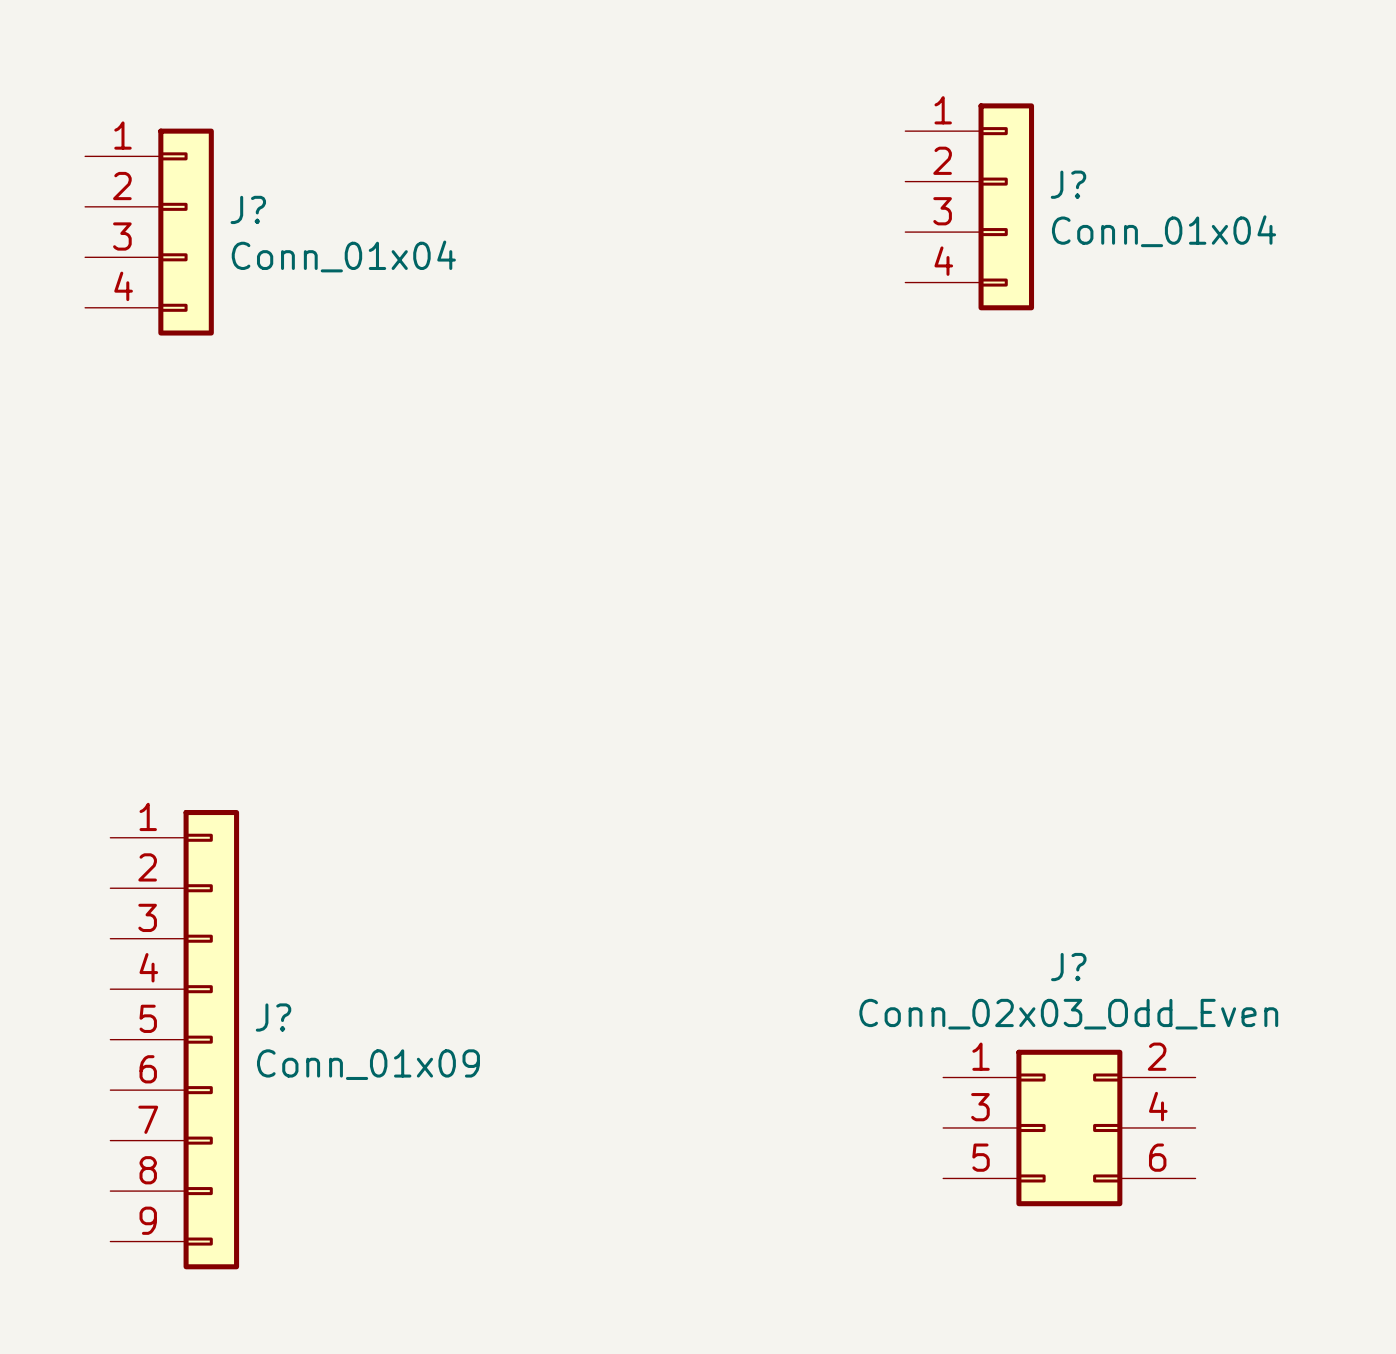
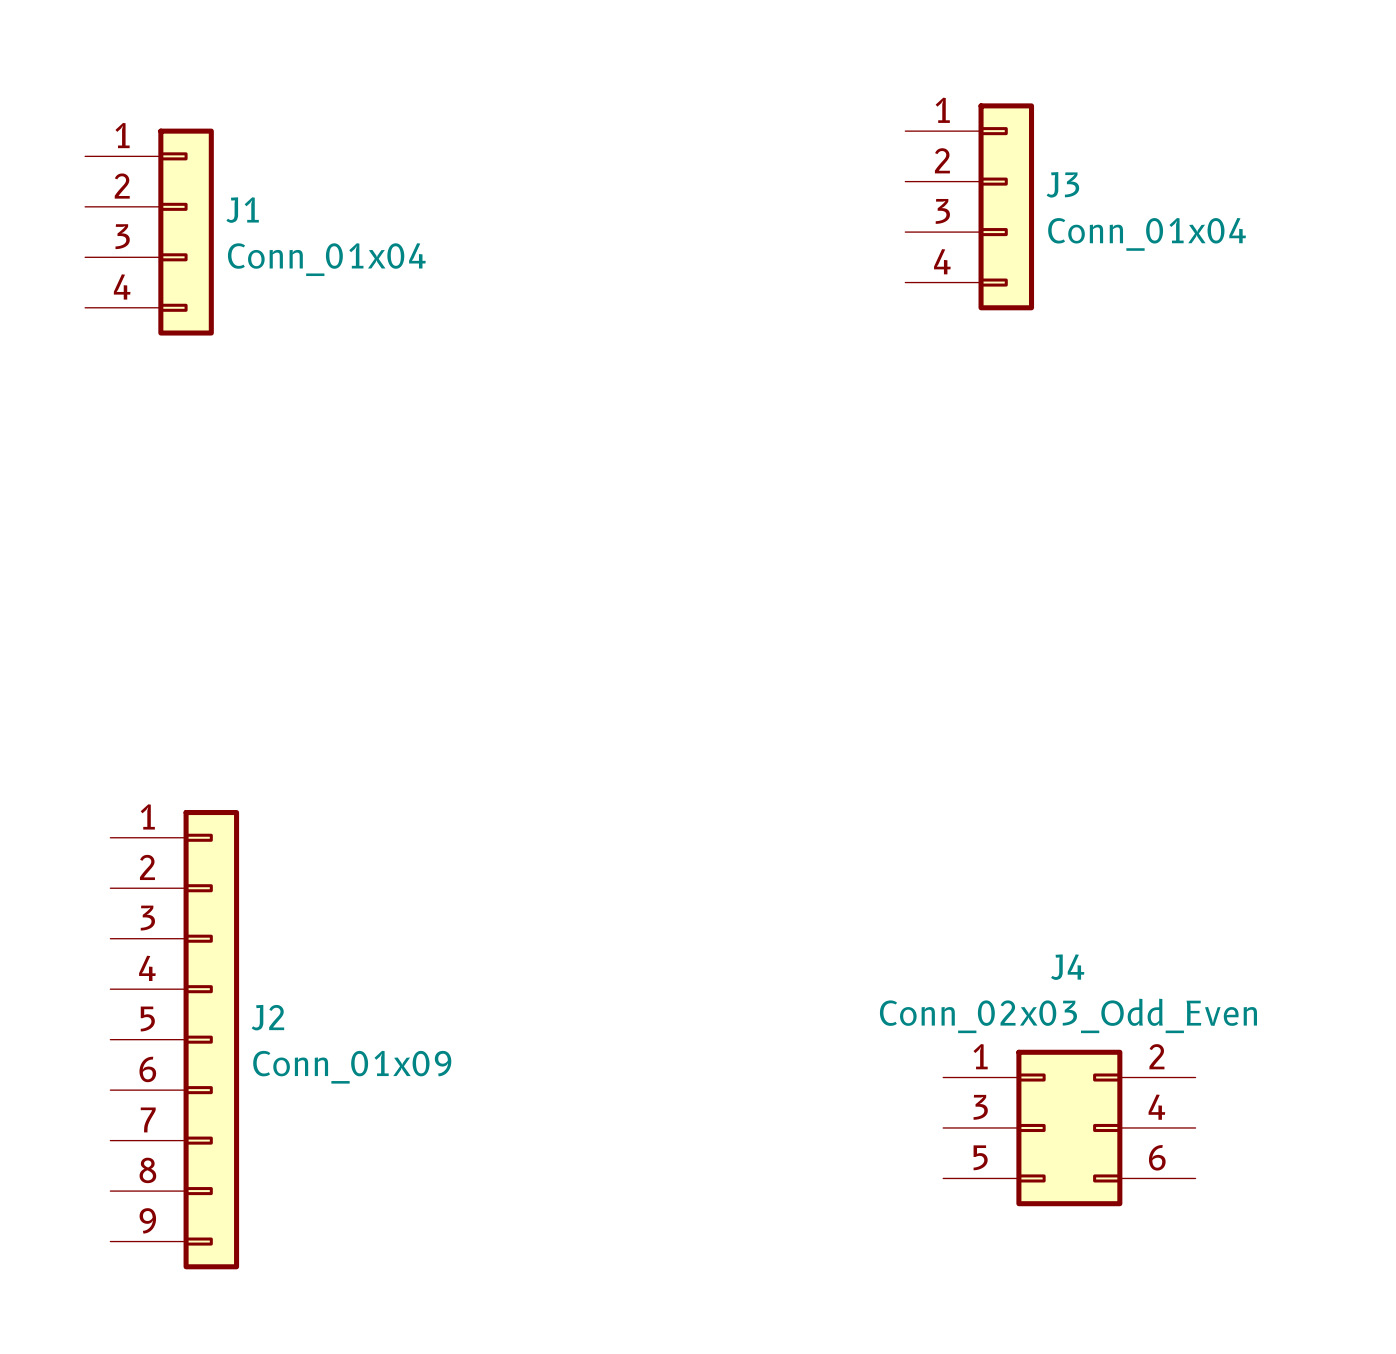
J? name: J? (1068, 184) -> J3 (1062, 184)
J? name: J? (248, 209) -> J1 (242, 210)
J? name: J? (1068, 967) -> J4 (1067, 967)
J? name: J? (273, 1017) -> J2 (267, 1017)

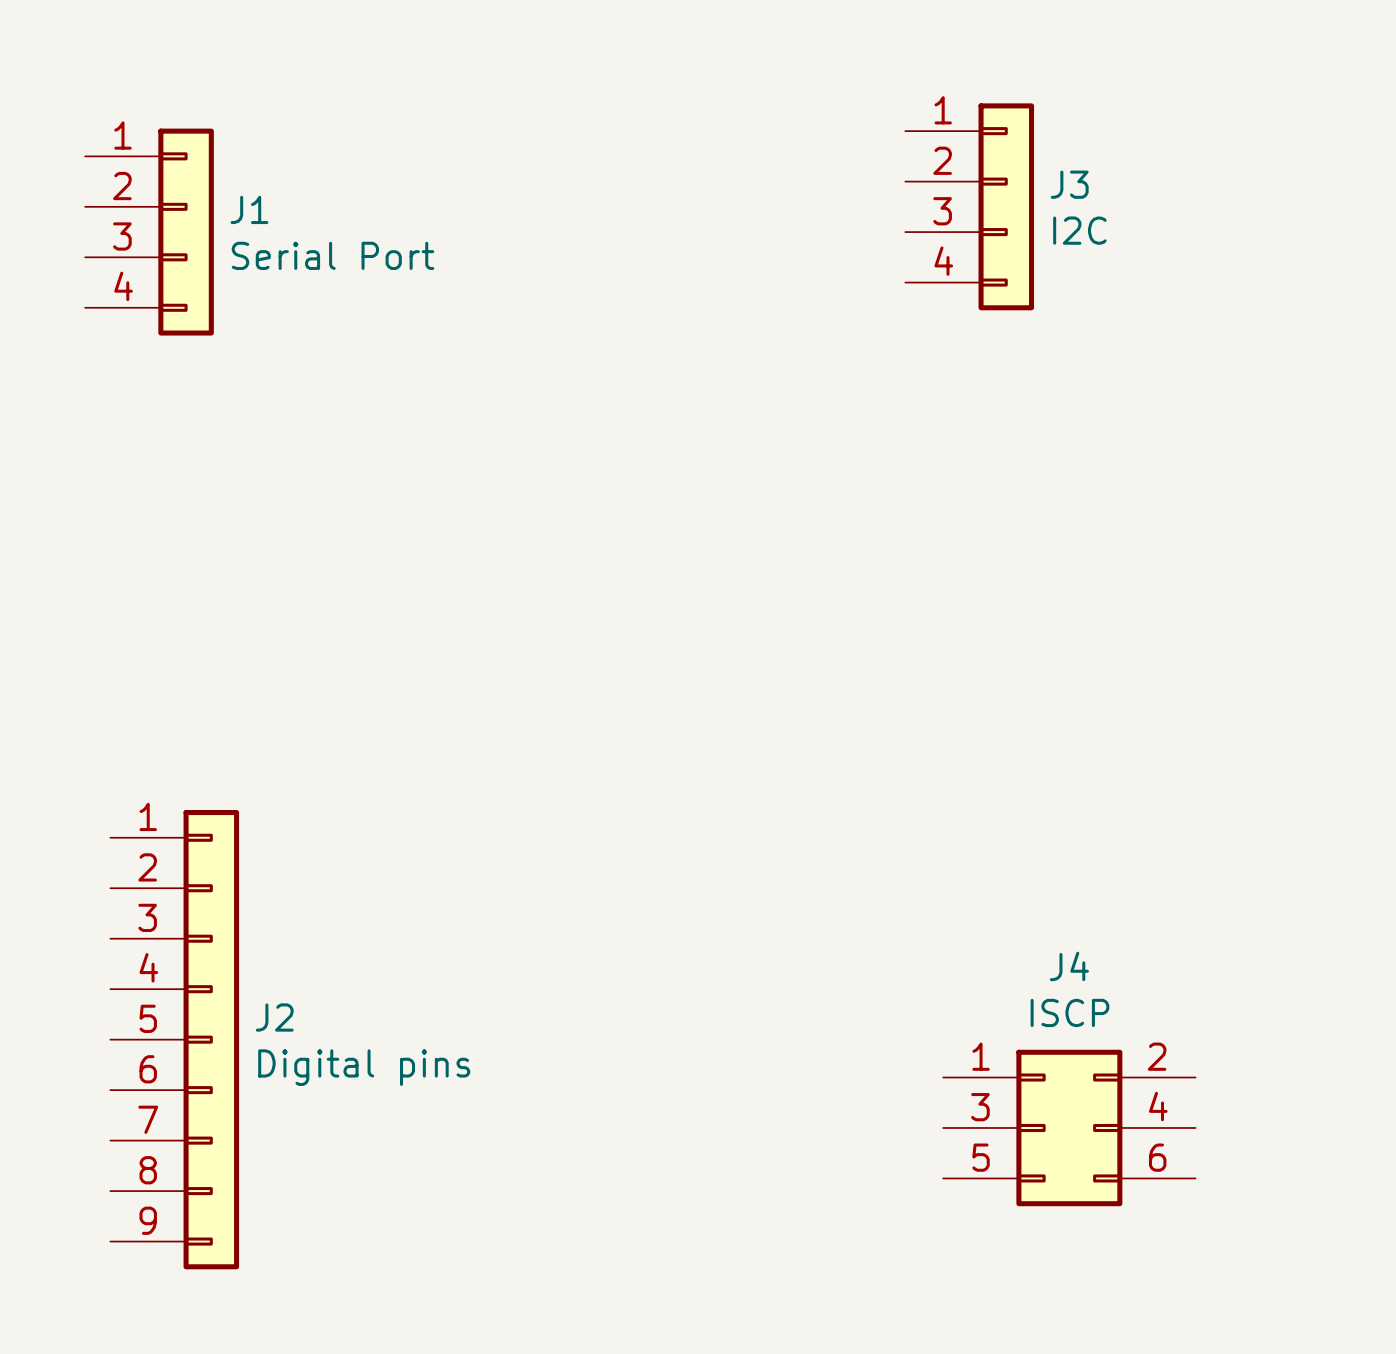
J3 value: Conn_01x04 (1147, 234) -> I2C (1079, 230)
J1 value: Conn_01x04 (326, 259) -> Serial Port (333, 255)
J4 value: Conn_02x03_Odd_Even (1068, 1015) -> ISCP (1069, 1012)
J2 value: Conn_01x09 (352, 1067) -> Digital pins (364, 1067)

